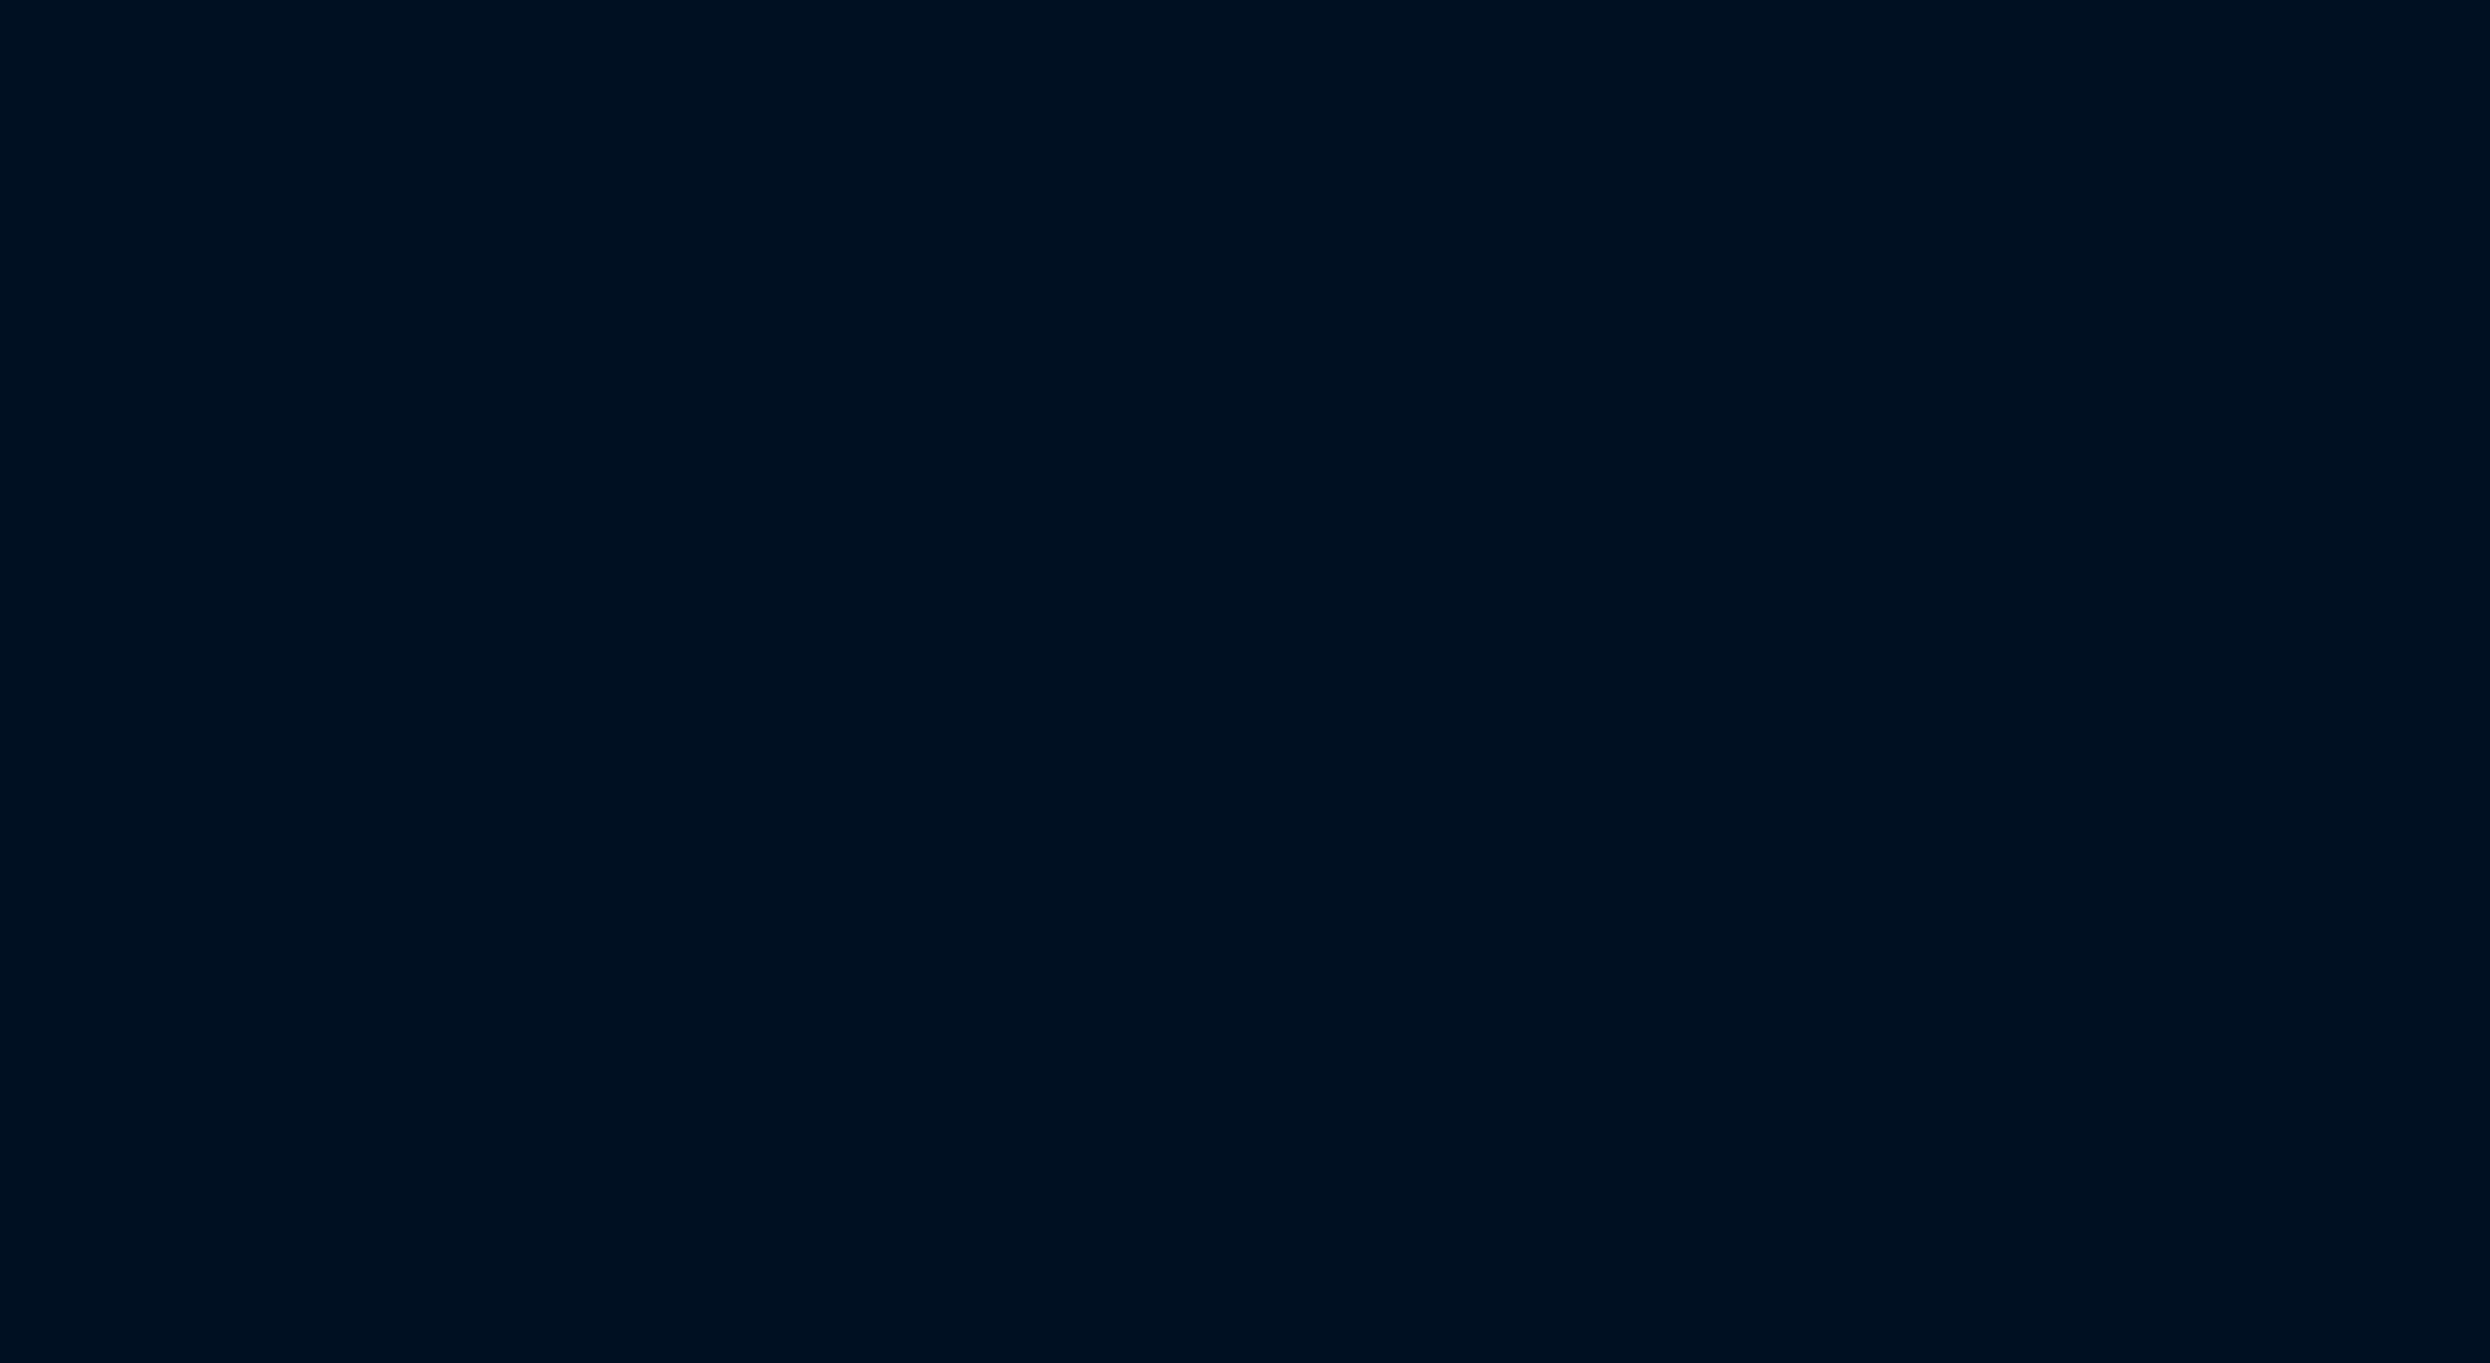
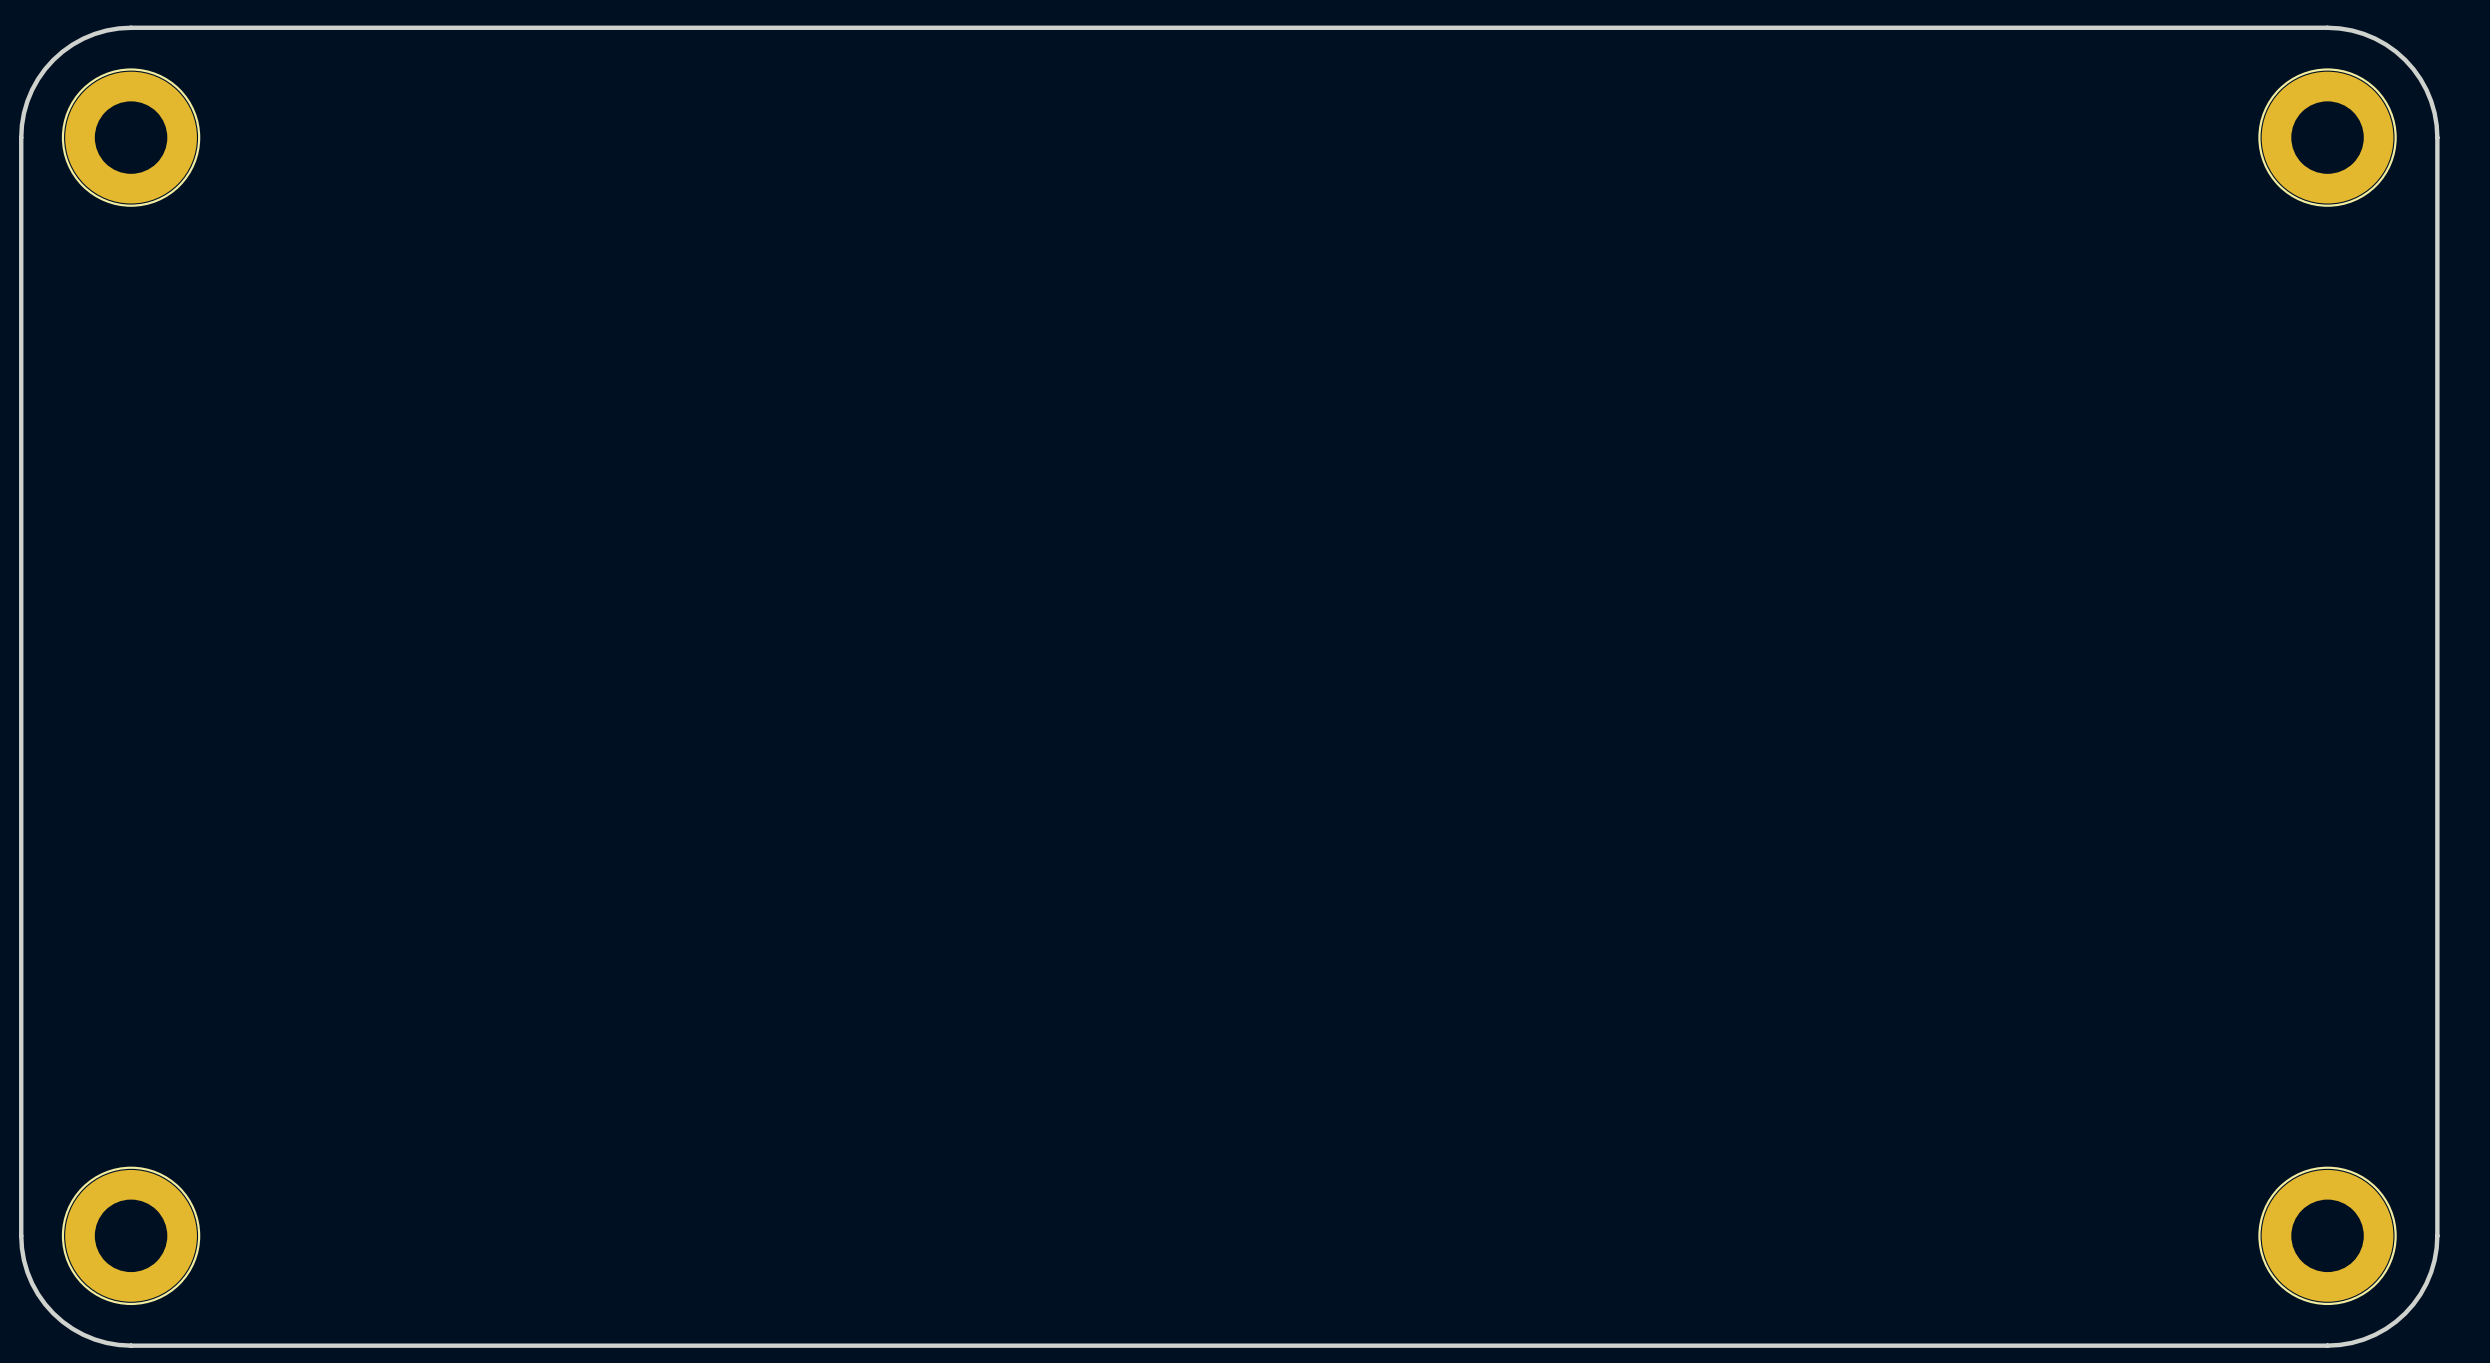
part: none -> (131, 137)
part: none -> (2327, 137)
board edge: none -> (2437, 137) (2434, 113) (2426, 89) (2405, 59) (2375, 38) (2351, 30) (2327, 27) (131, 27) (106, 30) (83, 38) (62, 51) (38, 79) (27, 101) (21, 137) (21, 1235) (23, 1260) (32, 1283) (53, 1313) (72, 1328) (94, 1339) (131, 1345) (2327, 1345) (2351, 1342) (2375, 1334) (2405, 1313) (2420, 1294) (2434, 1260) (2437, 1235) (2437, 137)
part: none -> (131, 1235)
part: none -> (2327, 1235)

